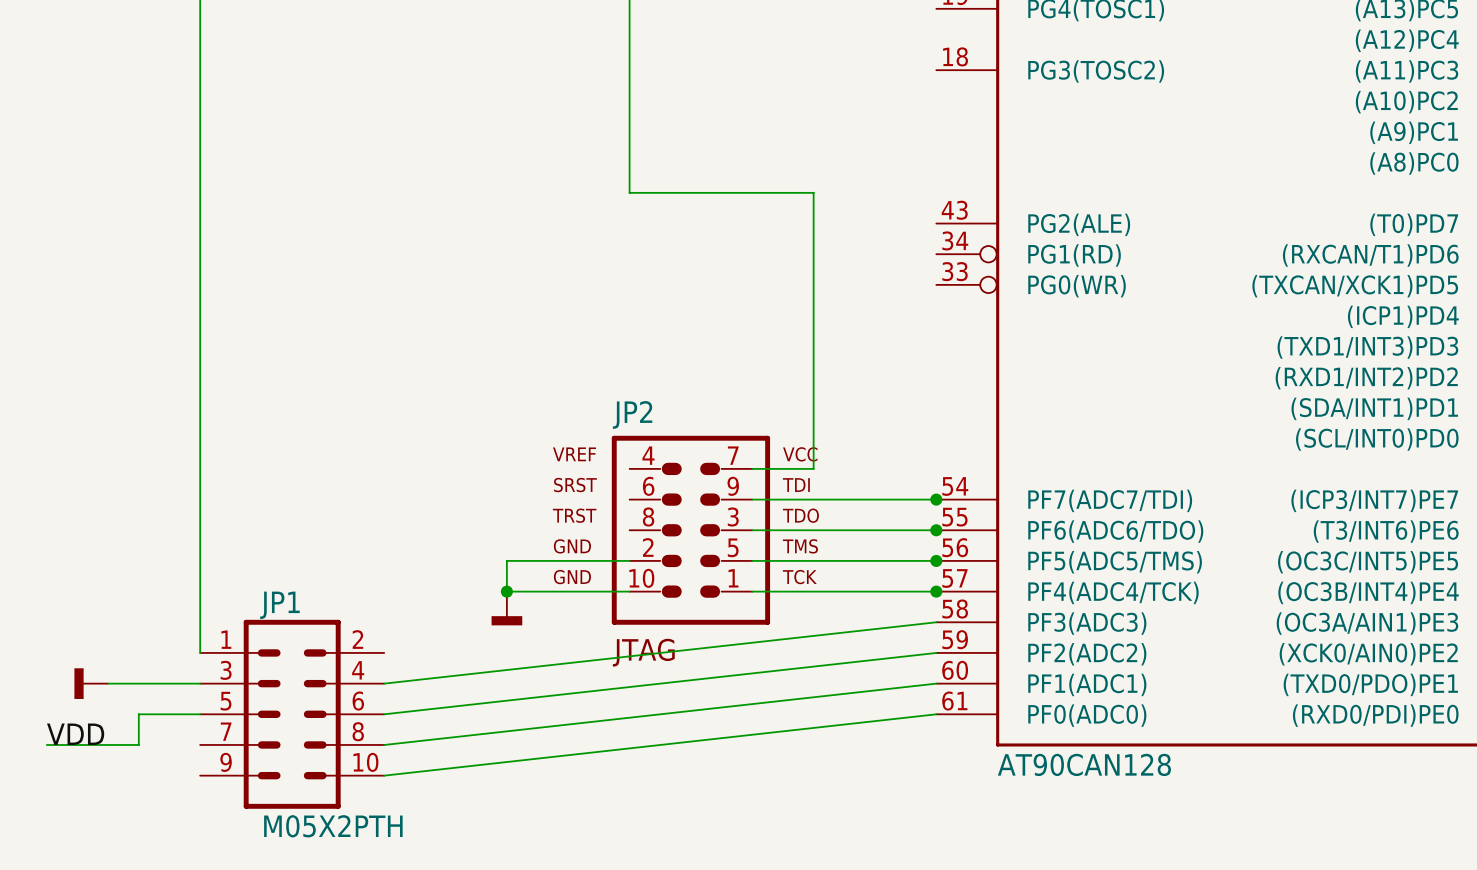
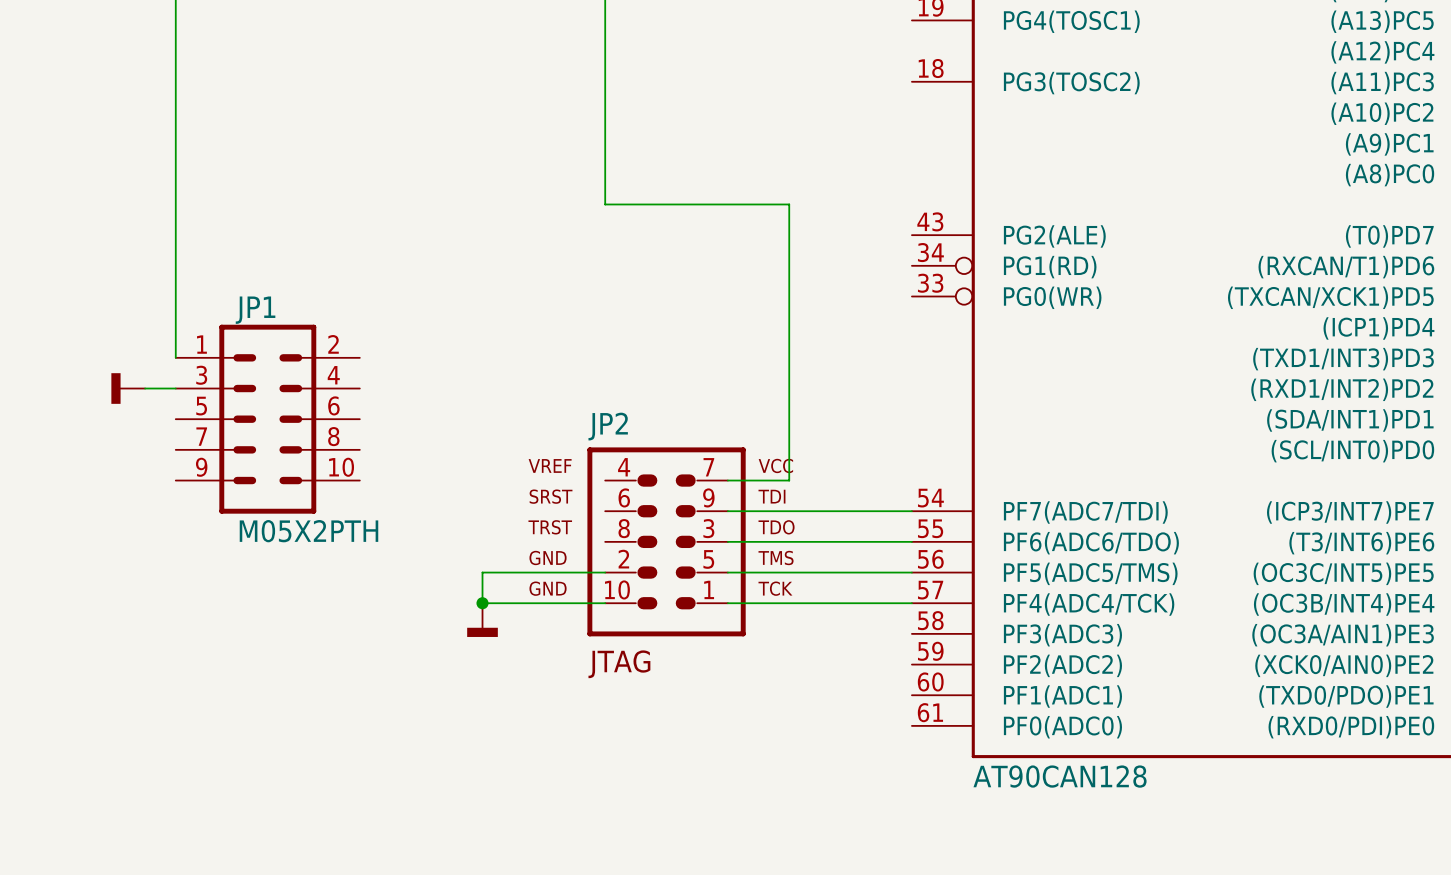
wire: (200, 346) (200, 652) -> none
power symbol: none -> (128, 388)
wire: none -> (145, 388) (175, 388)
junction: (936, 499) -> none
junction: (936, 530) -> none
junction: (936, 560) -> none
junction: (936, 591) -> none
wire: (936, 622) (384, 683) -> none
wire: (936, 652) (384, 714) -> none
power symbol: (91, 683) -> none
wire: (108, 683) (200, 683) -> none
wire: (936, 683) (384, 744) -> none
wire: (200, 714) (138, 714) (138, 744) (46, 744) -> none
JP1 position: (292, 714) -> (267, 419)
wire: (936, 714) (384, 775) -> none
label: VDD (75, 734) -> none

